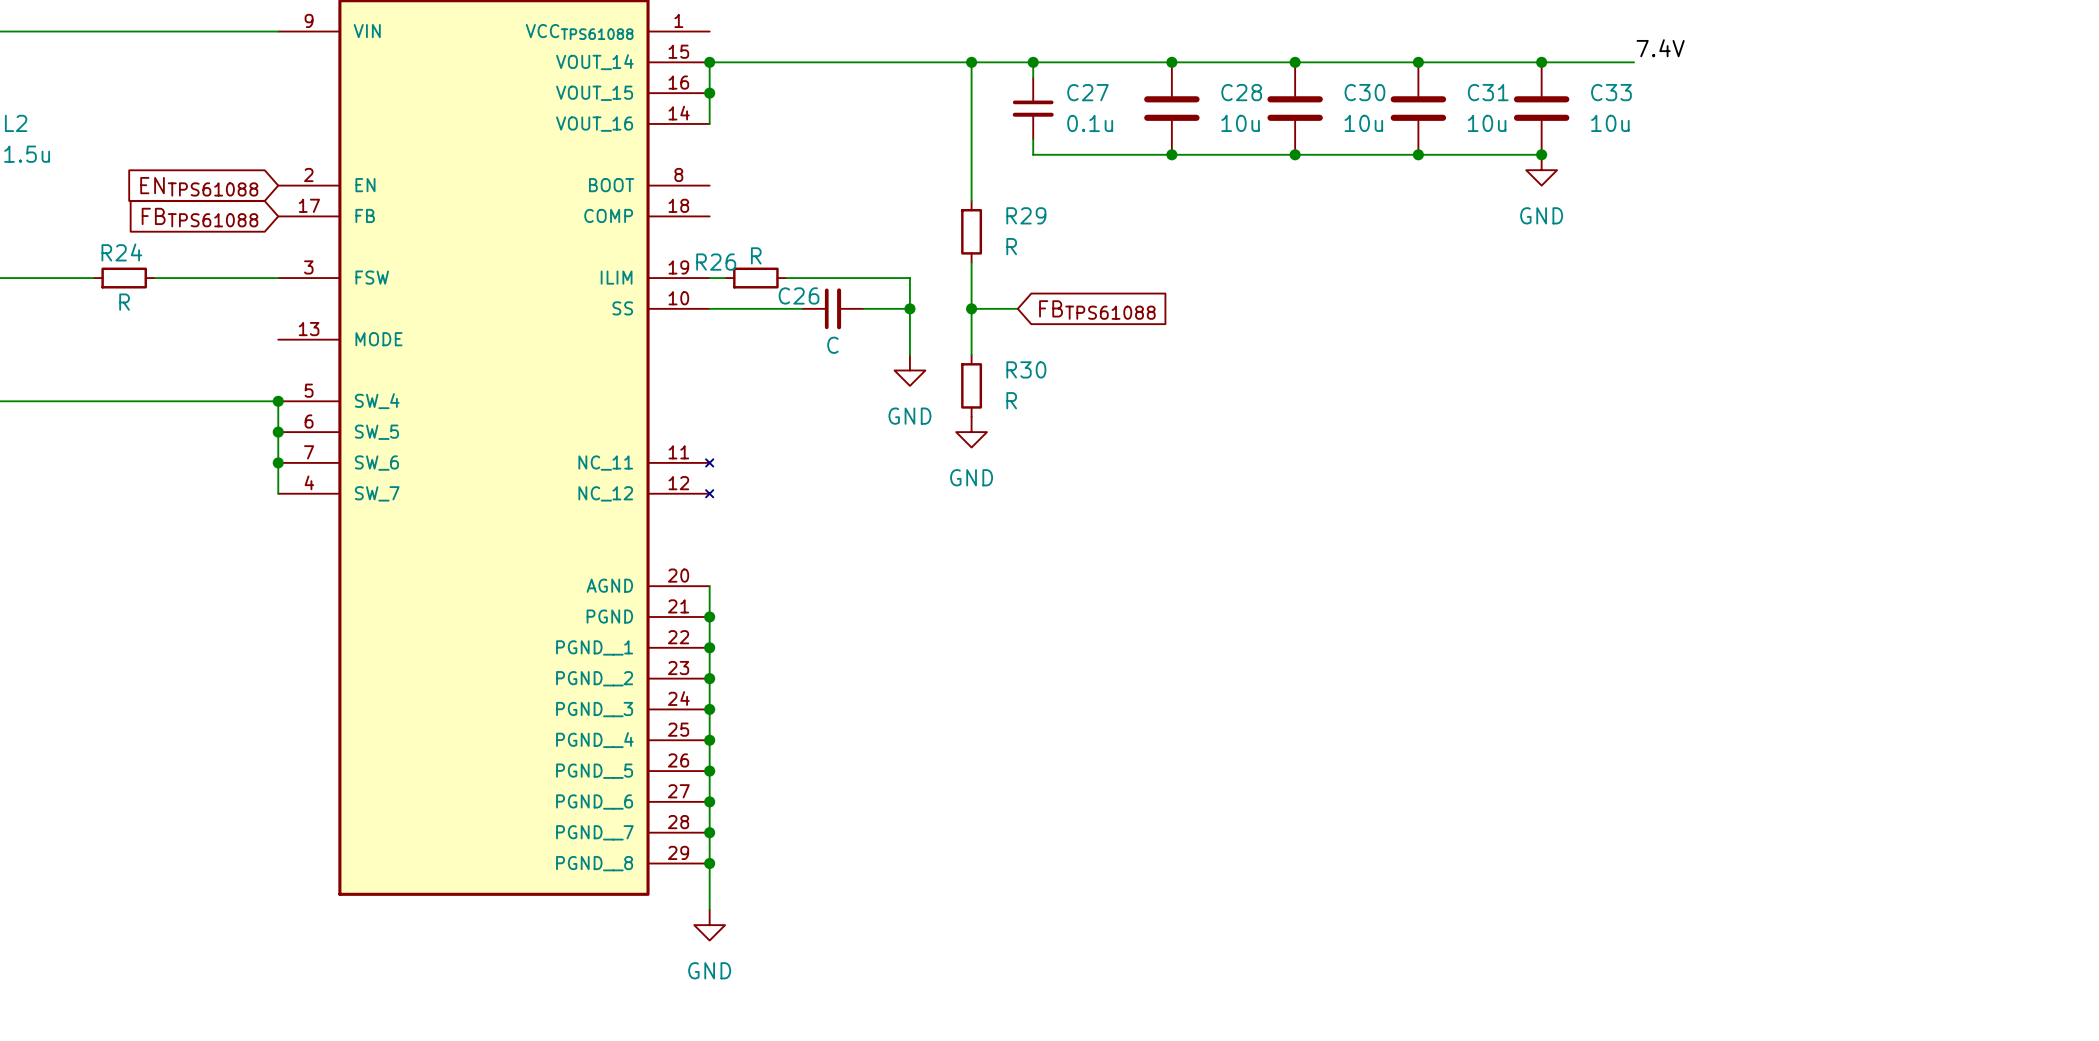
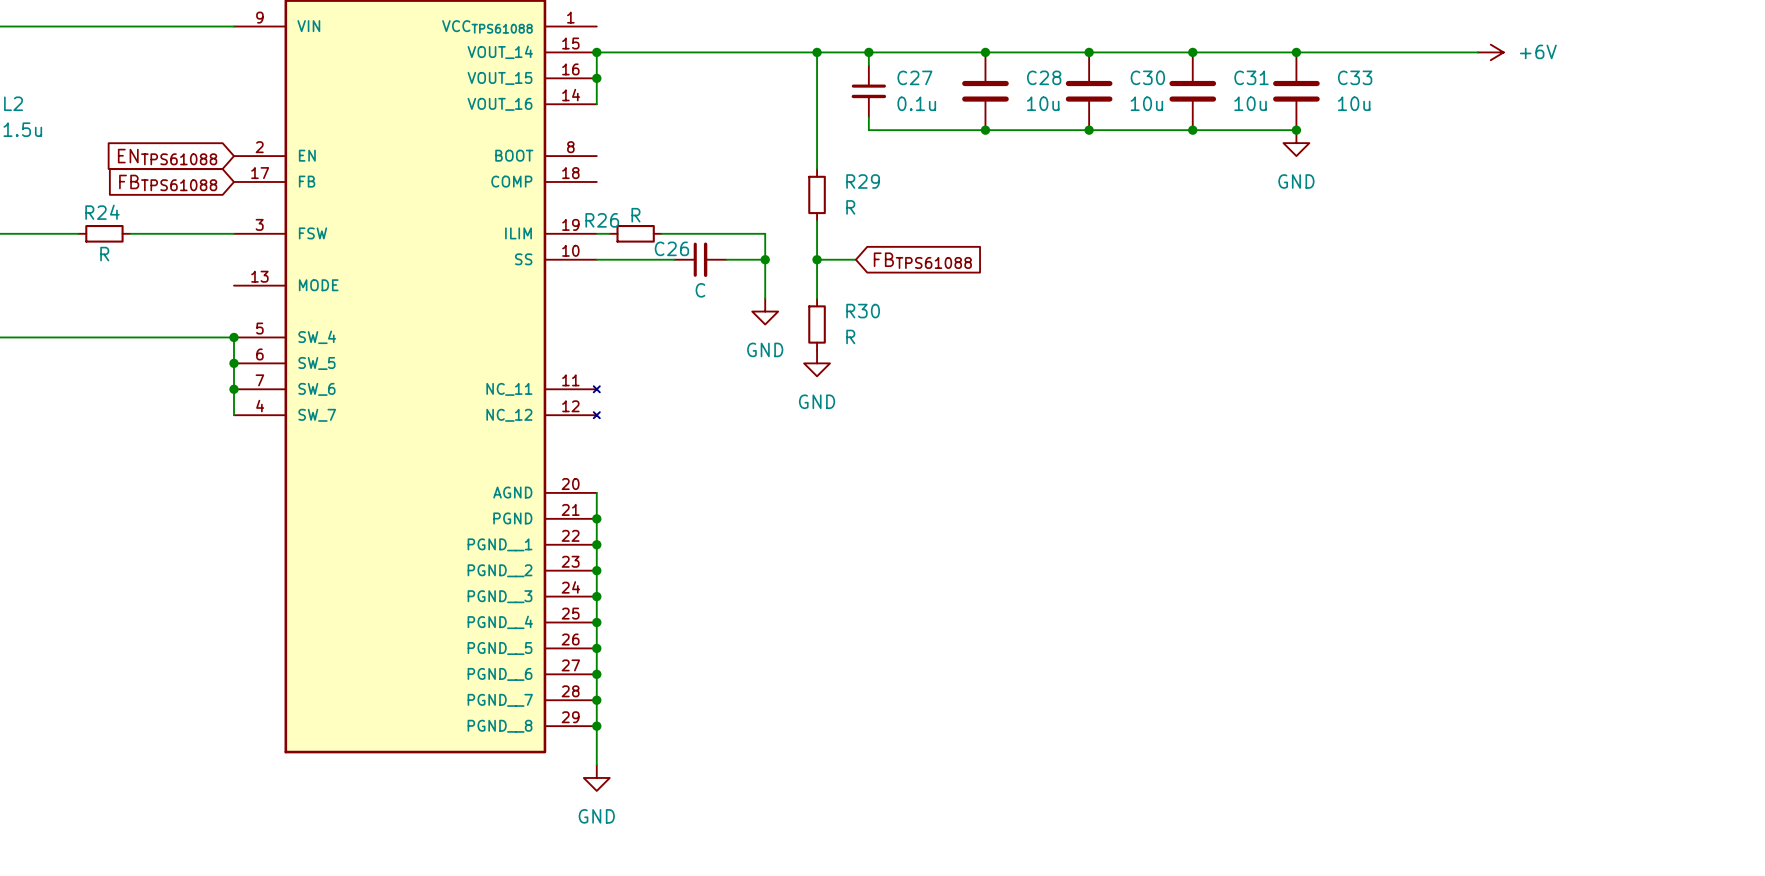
label: 7.4V (1660, 48) -> none
wire: none -> (1374, 52) (1477, 52)
power symbol: none -> +6V (1490, 52)

